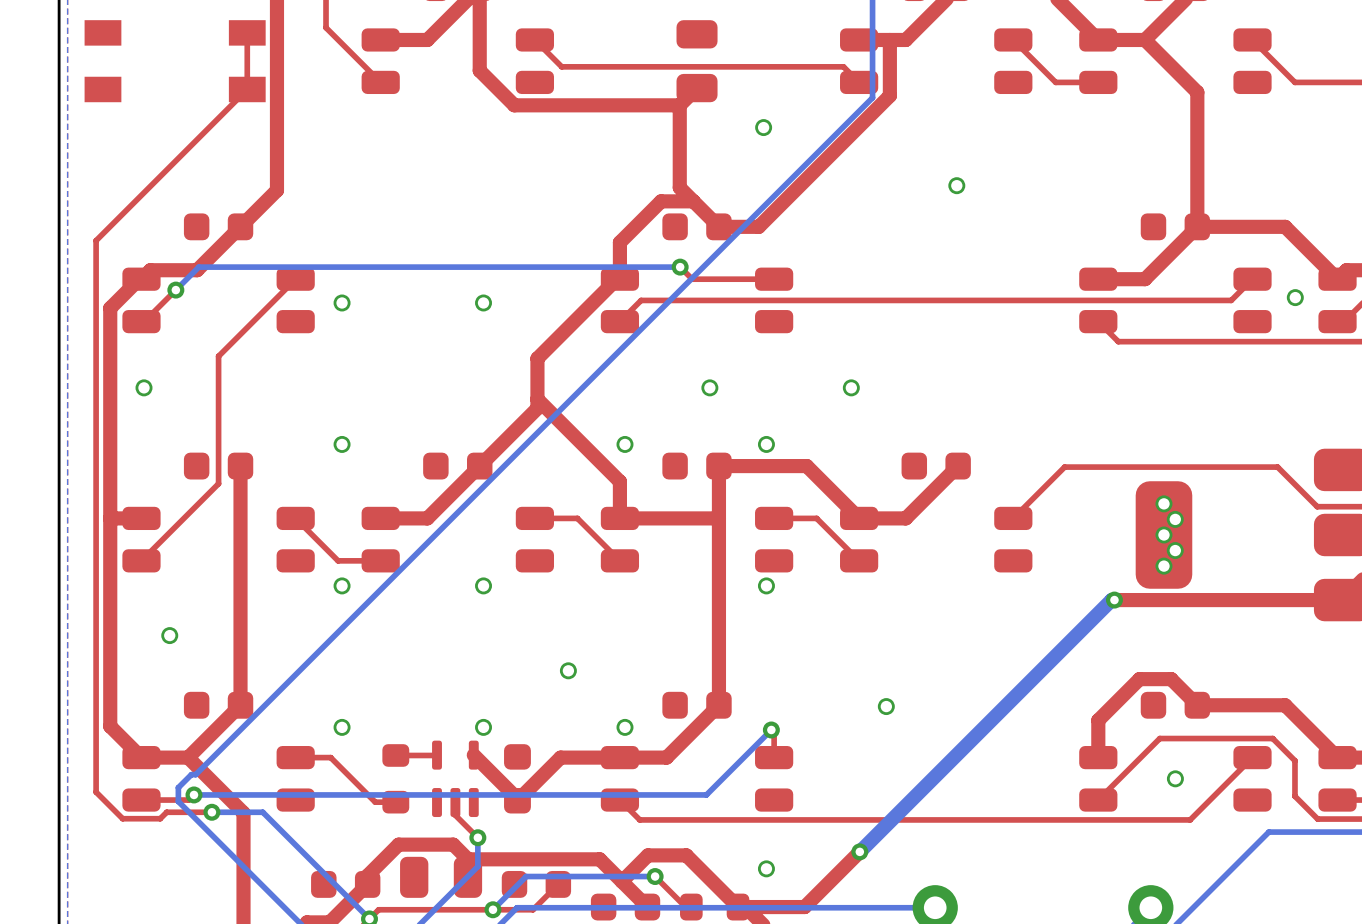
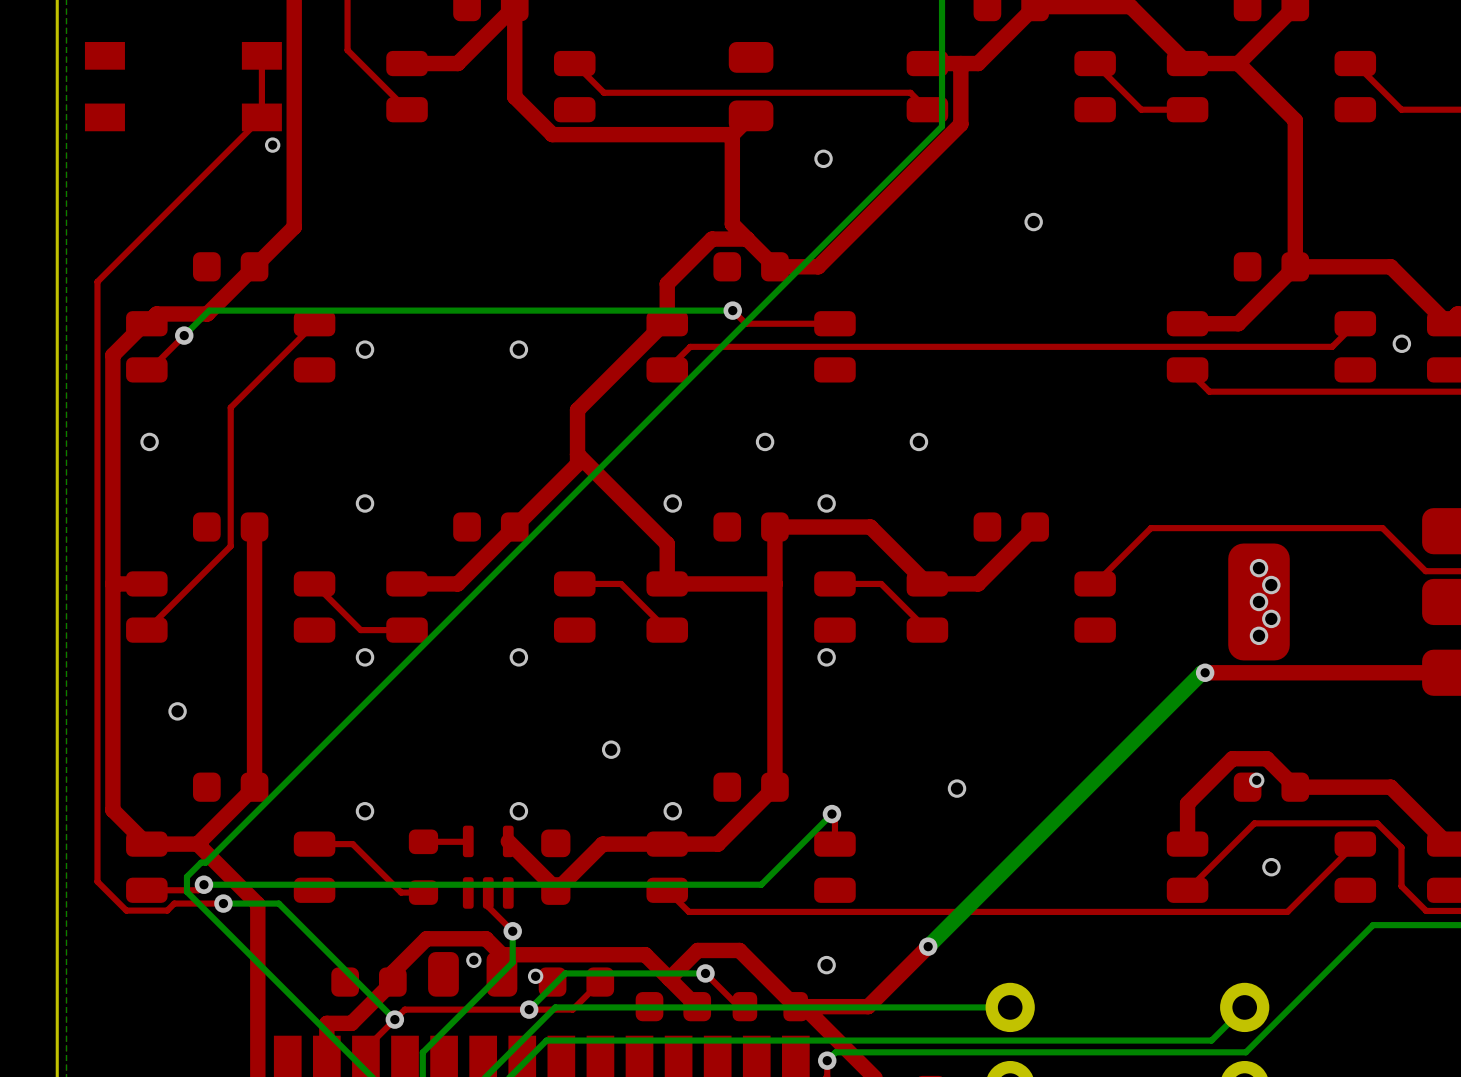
via: none -> (272, 145)
via: none -> (1256, 780)
via: none -> (473, 960)
via: none -> (535, 976)

